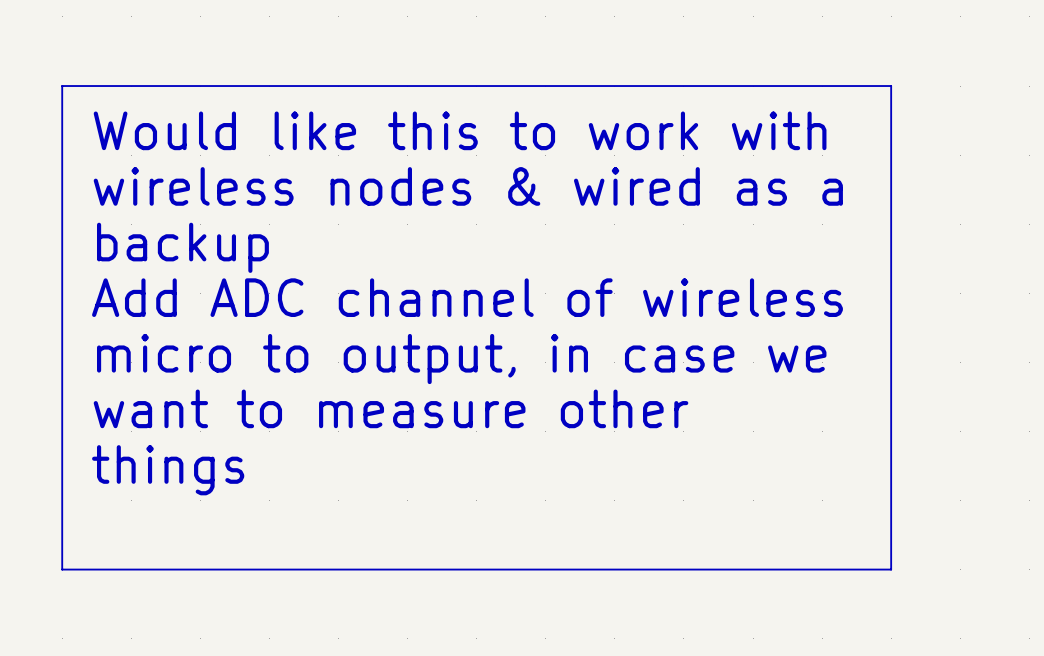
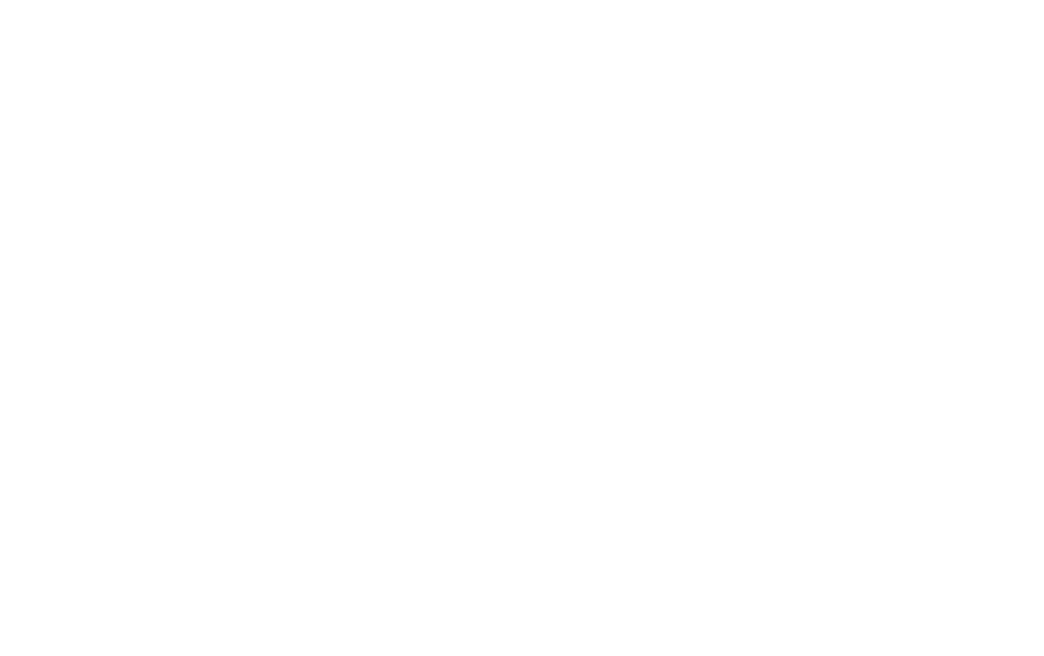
line: (62, 86) (891, 86) (891, 569) (62, 569) (62, 86) -> none
text: Would like this to work with (460, 130) -> none
text: wireless nodes & wired as a (468, 186) -> none
text: backup (182, 247) -> none
text: Add ADC channel of wireless (467, 297) -> none
text: micro to output, in case we (461, 359) -> none
text: want to measure other (391, 408) -> none
text: things (168, 470) -> none

